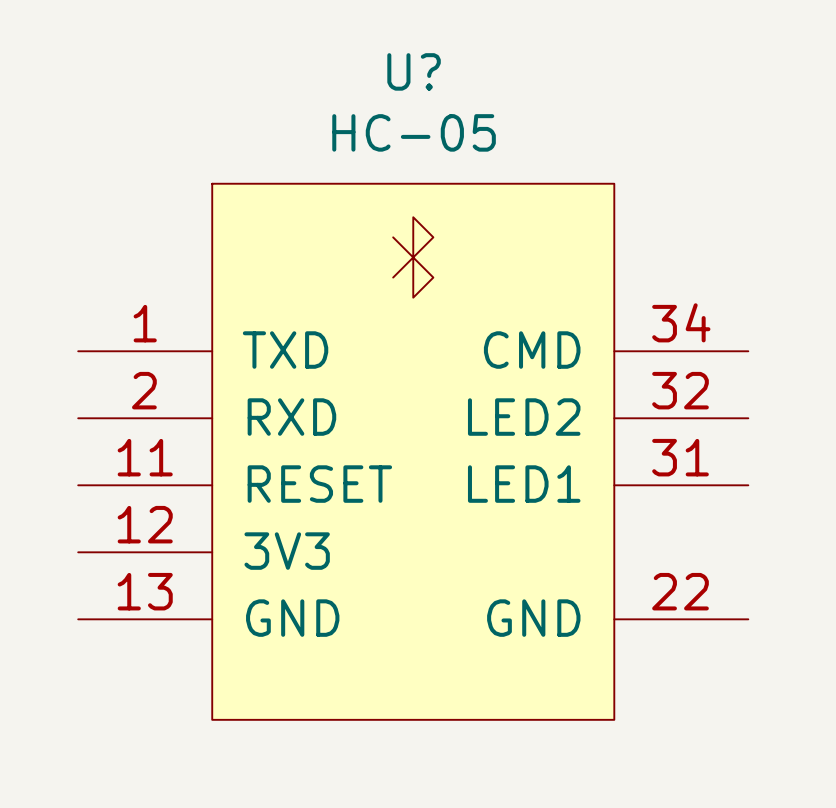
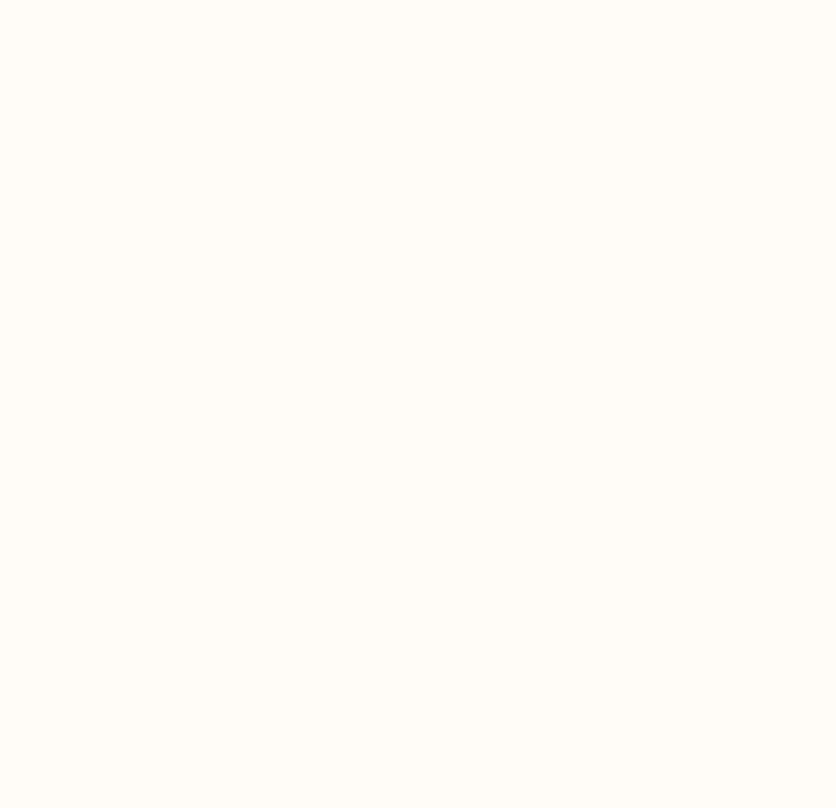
U?: HC-05 (413, 451) -> none

